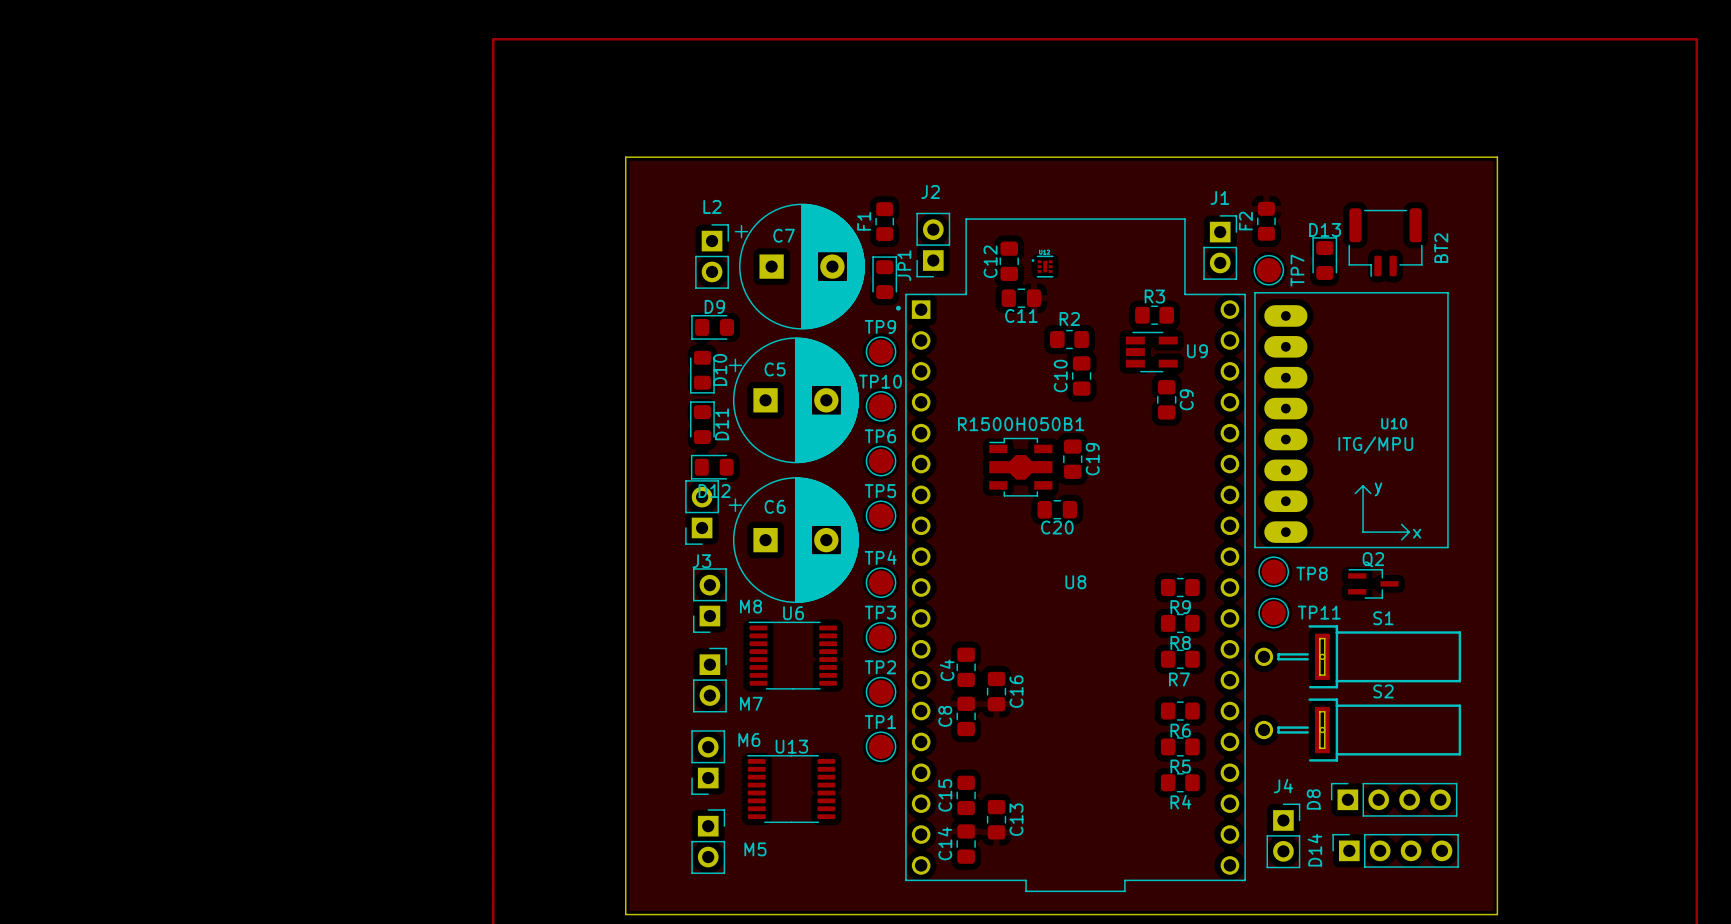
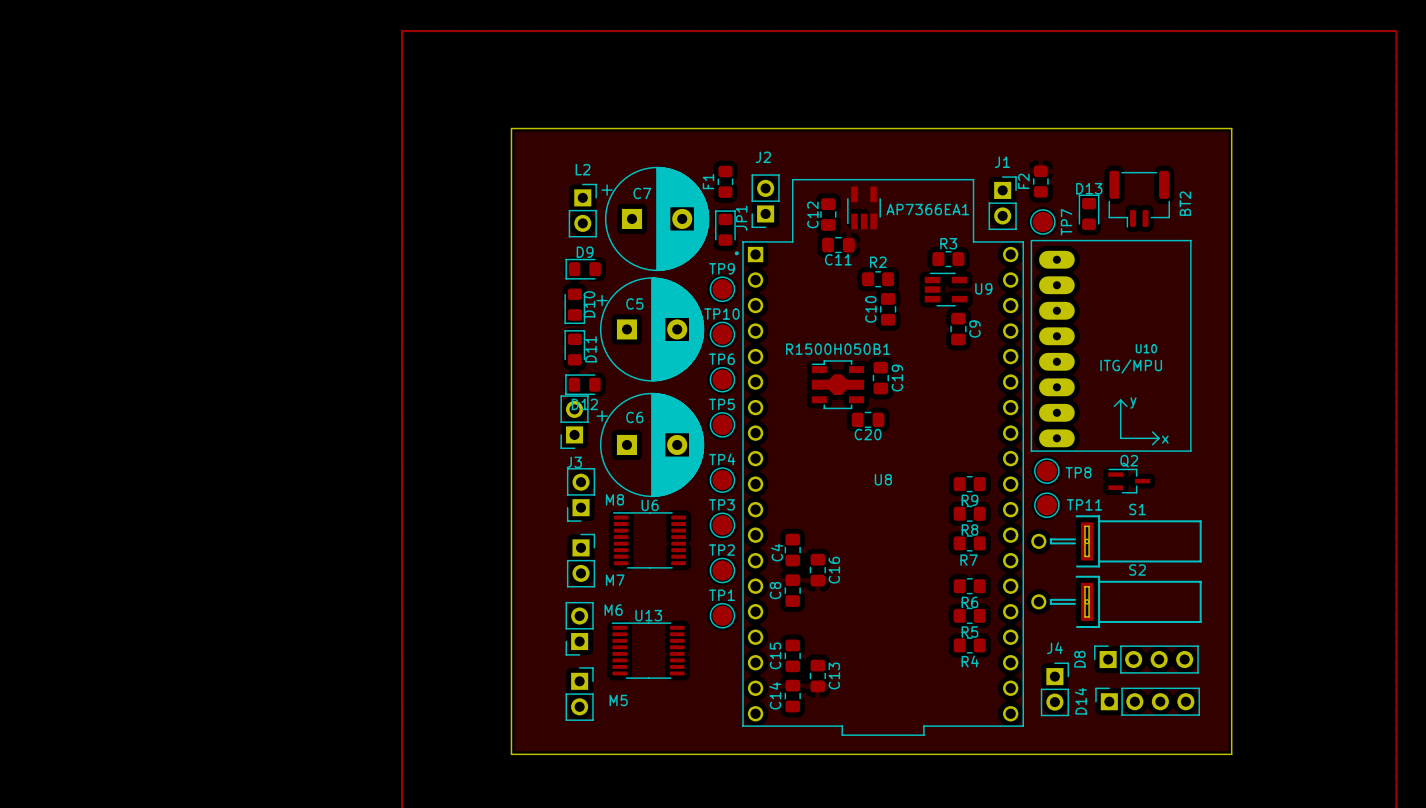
AP7366EA1: none -> (864, 207)
part: (1042, 266) -> none

